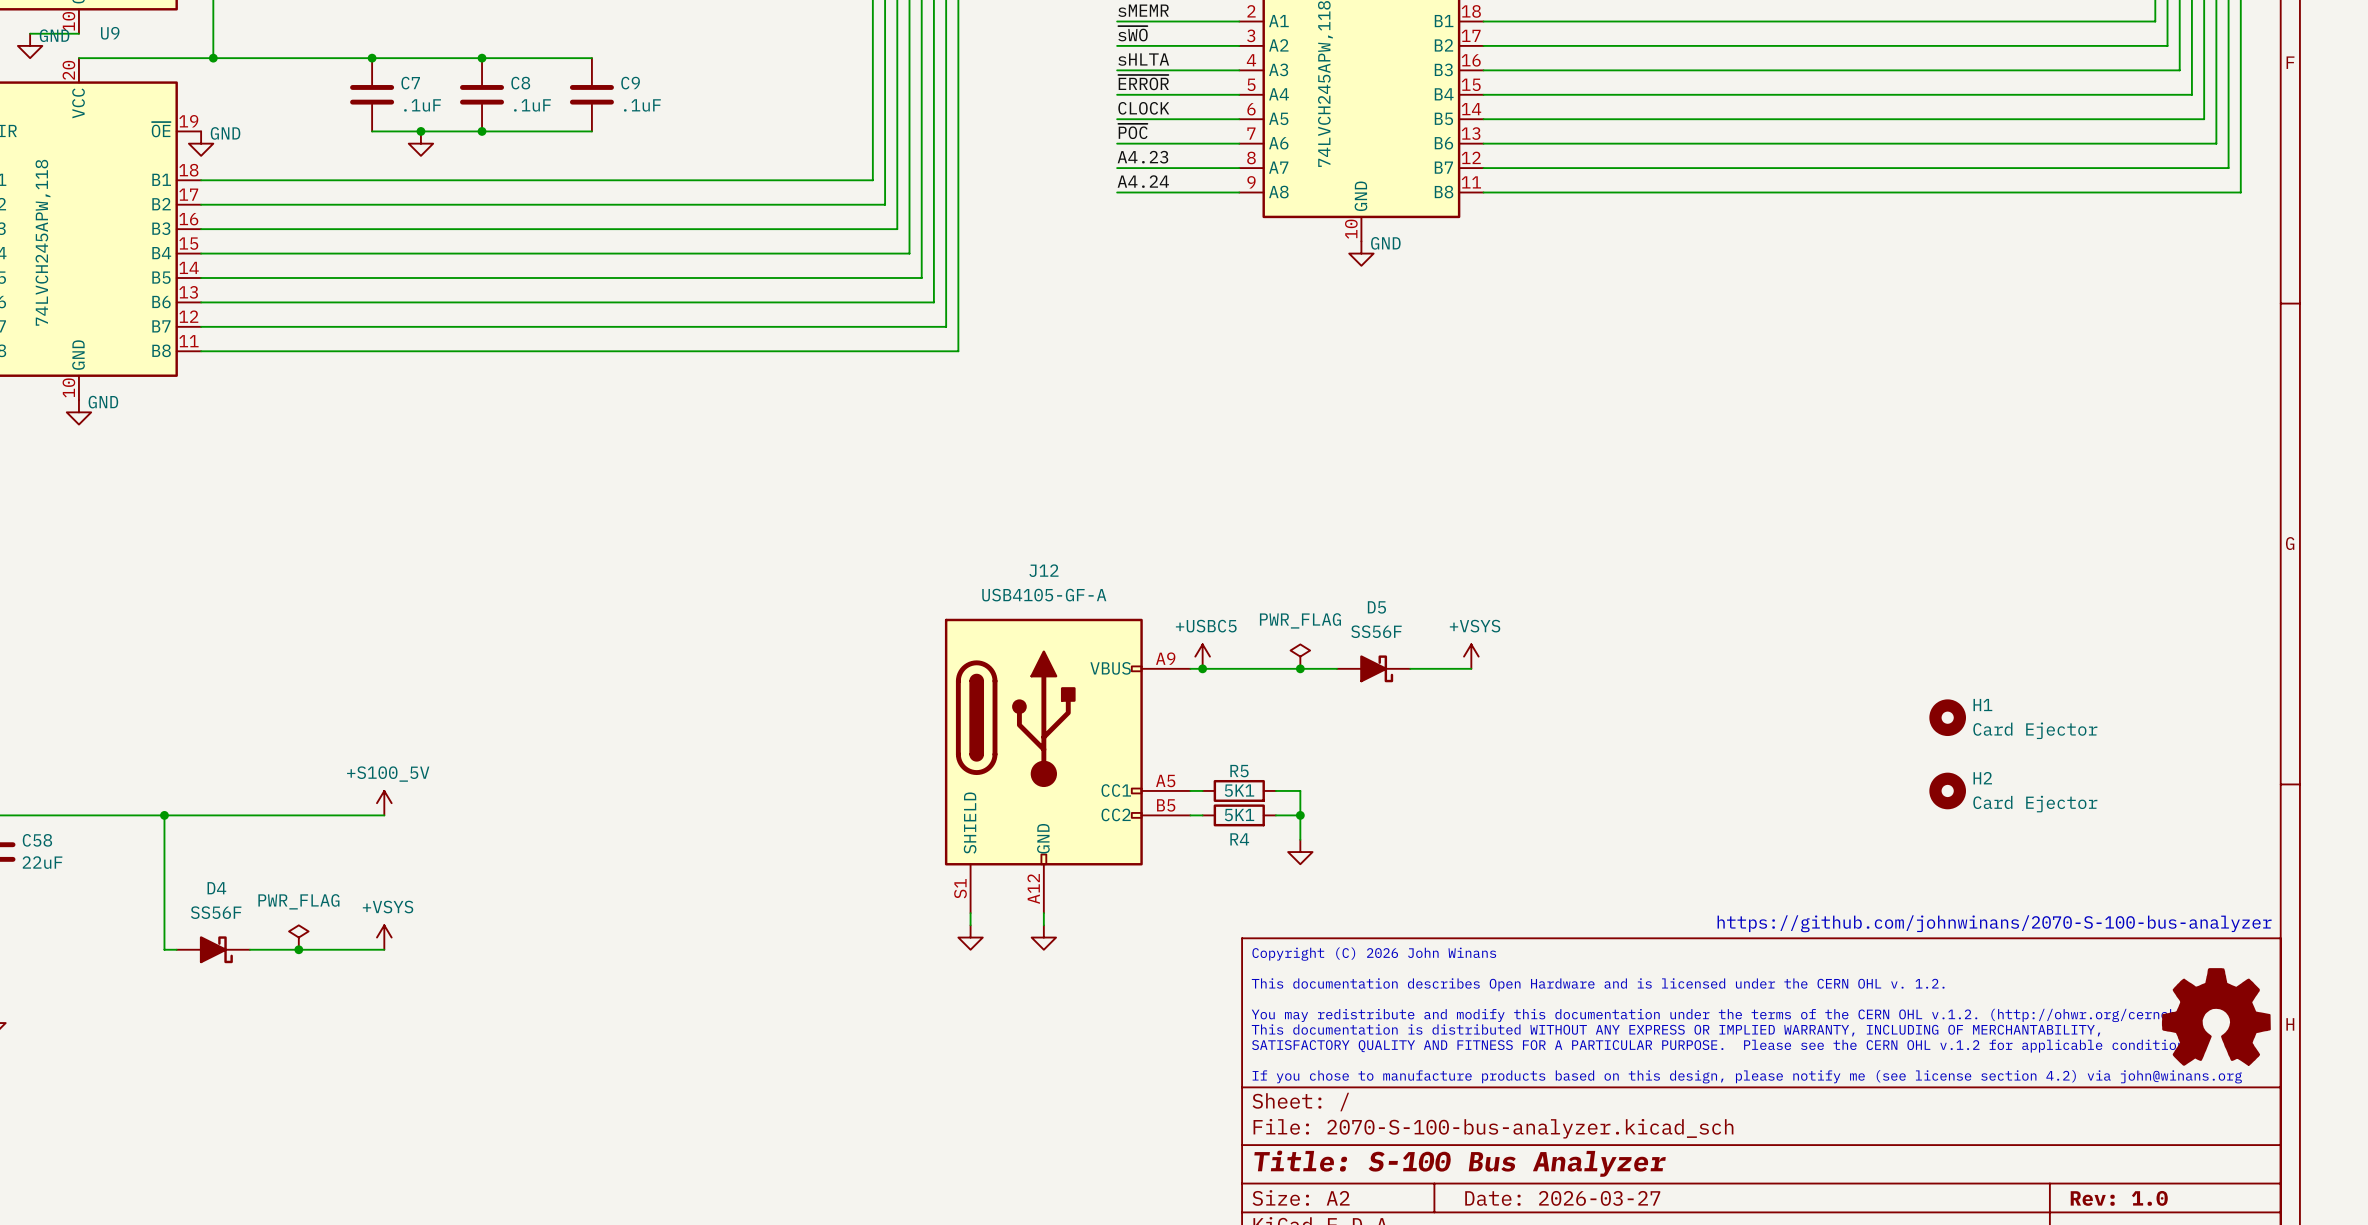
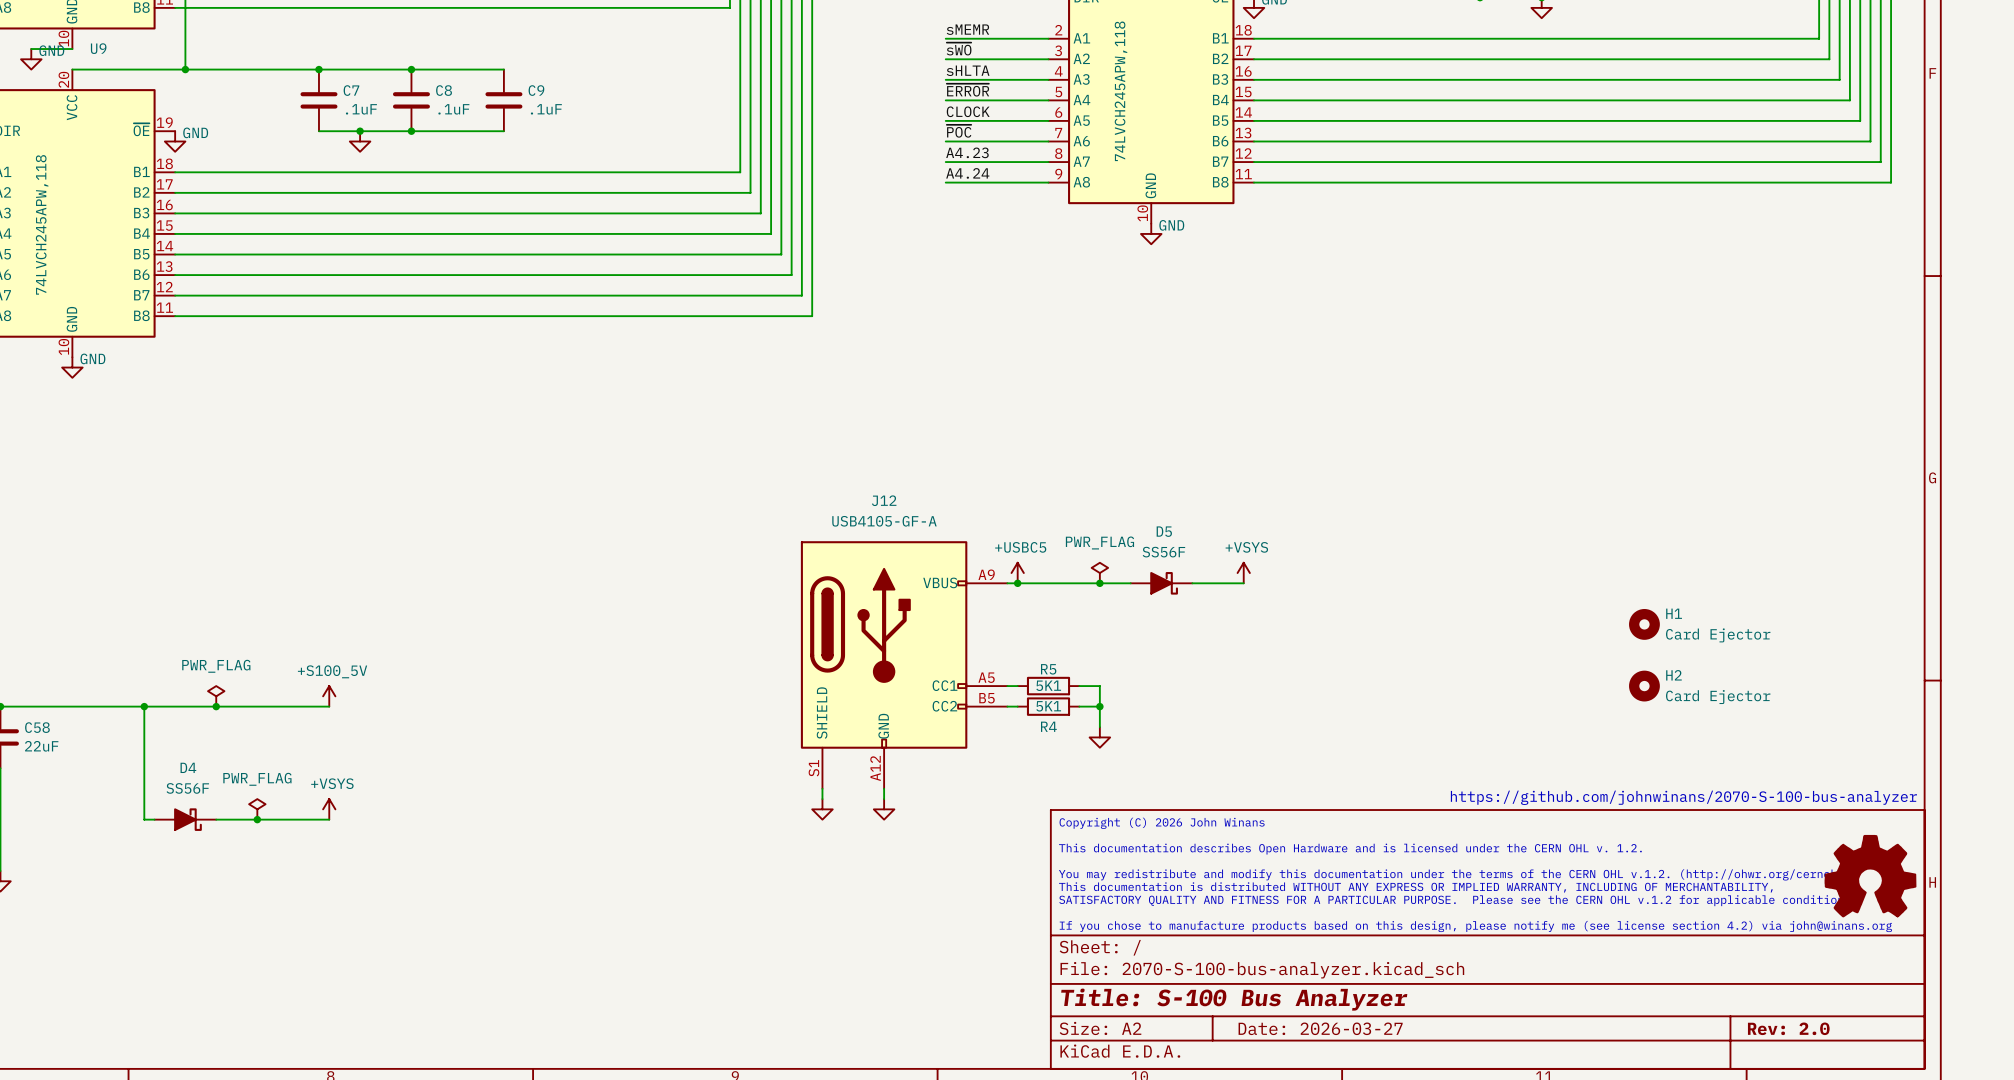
power symbol: none -> PWR_FLAG (216, 696)
junction: none -> (216, 706)
title block: Rev: 1.0 (2119, 1198) -> Rev: 2.0 (1788, 1028)

